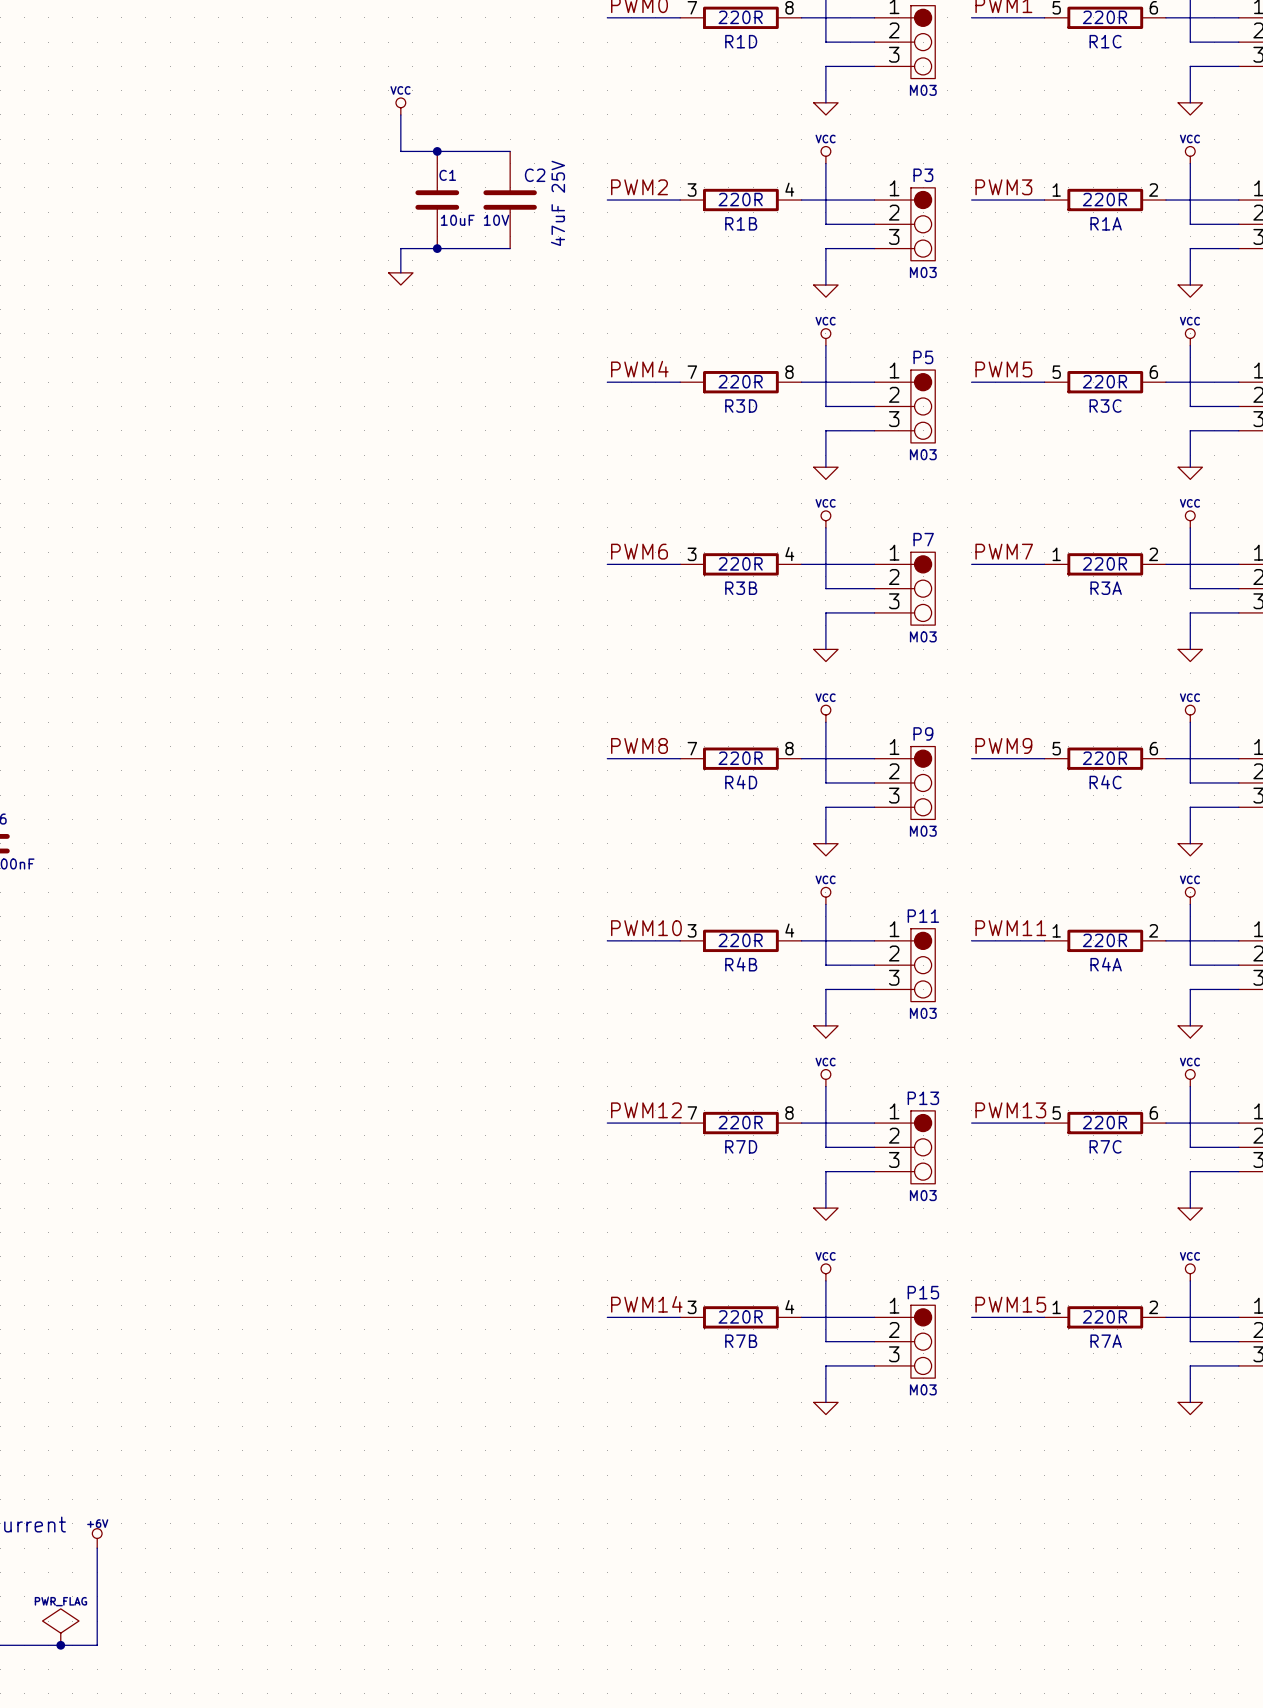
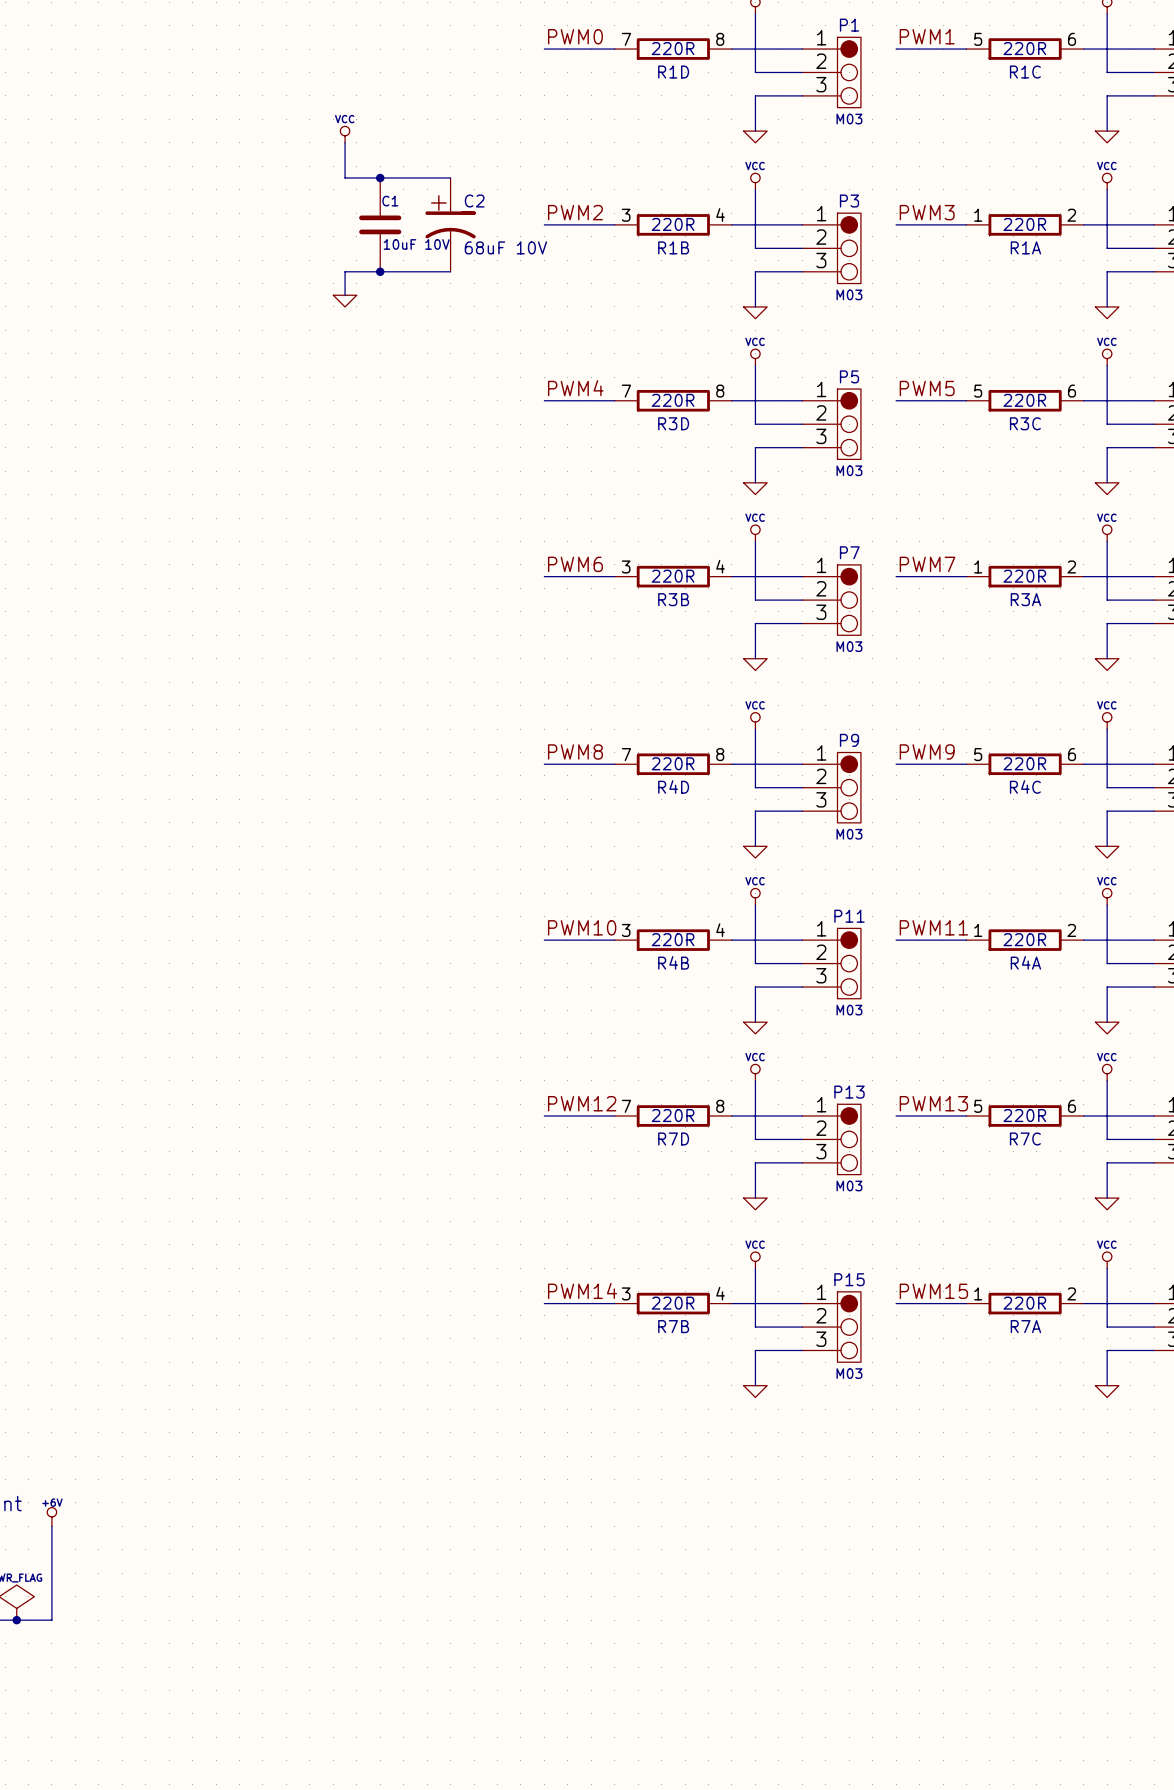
C2 symbol: [483, 151, 537, 249] -> [425, 177, 476, 272]
C2 value: 47uF 25V (557, 203) -> 68uF 10V (505, 247)

